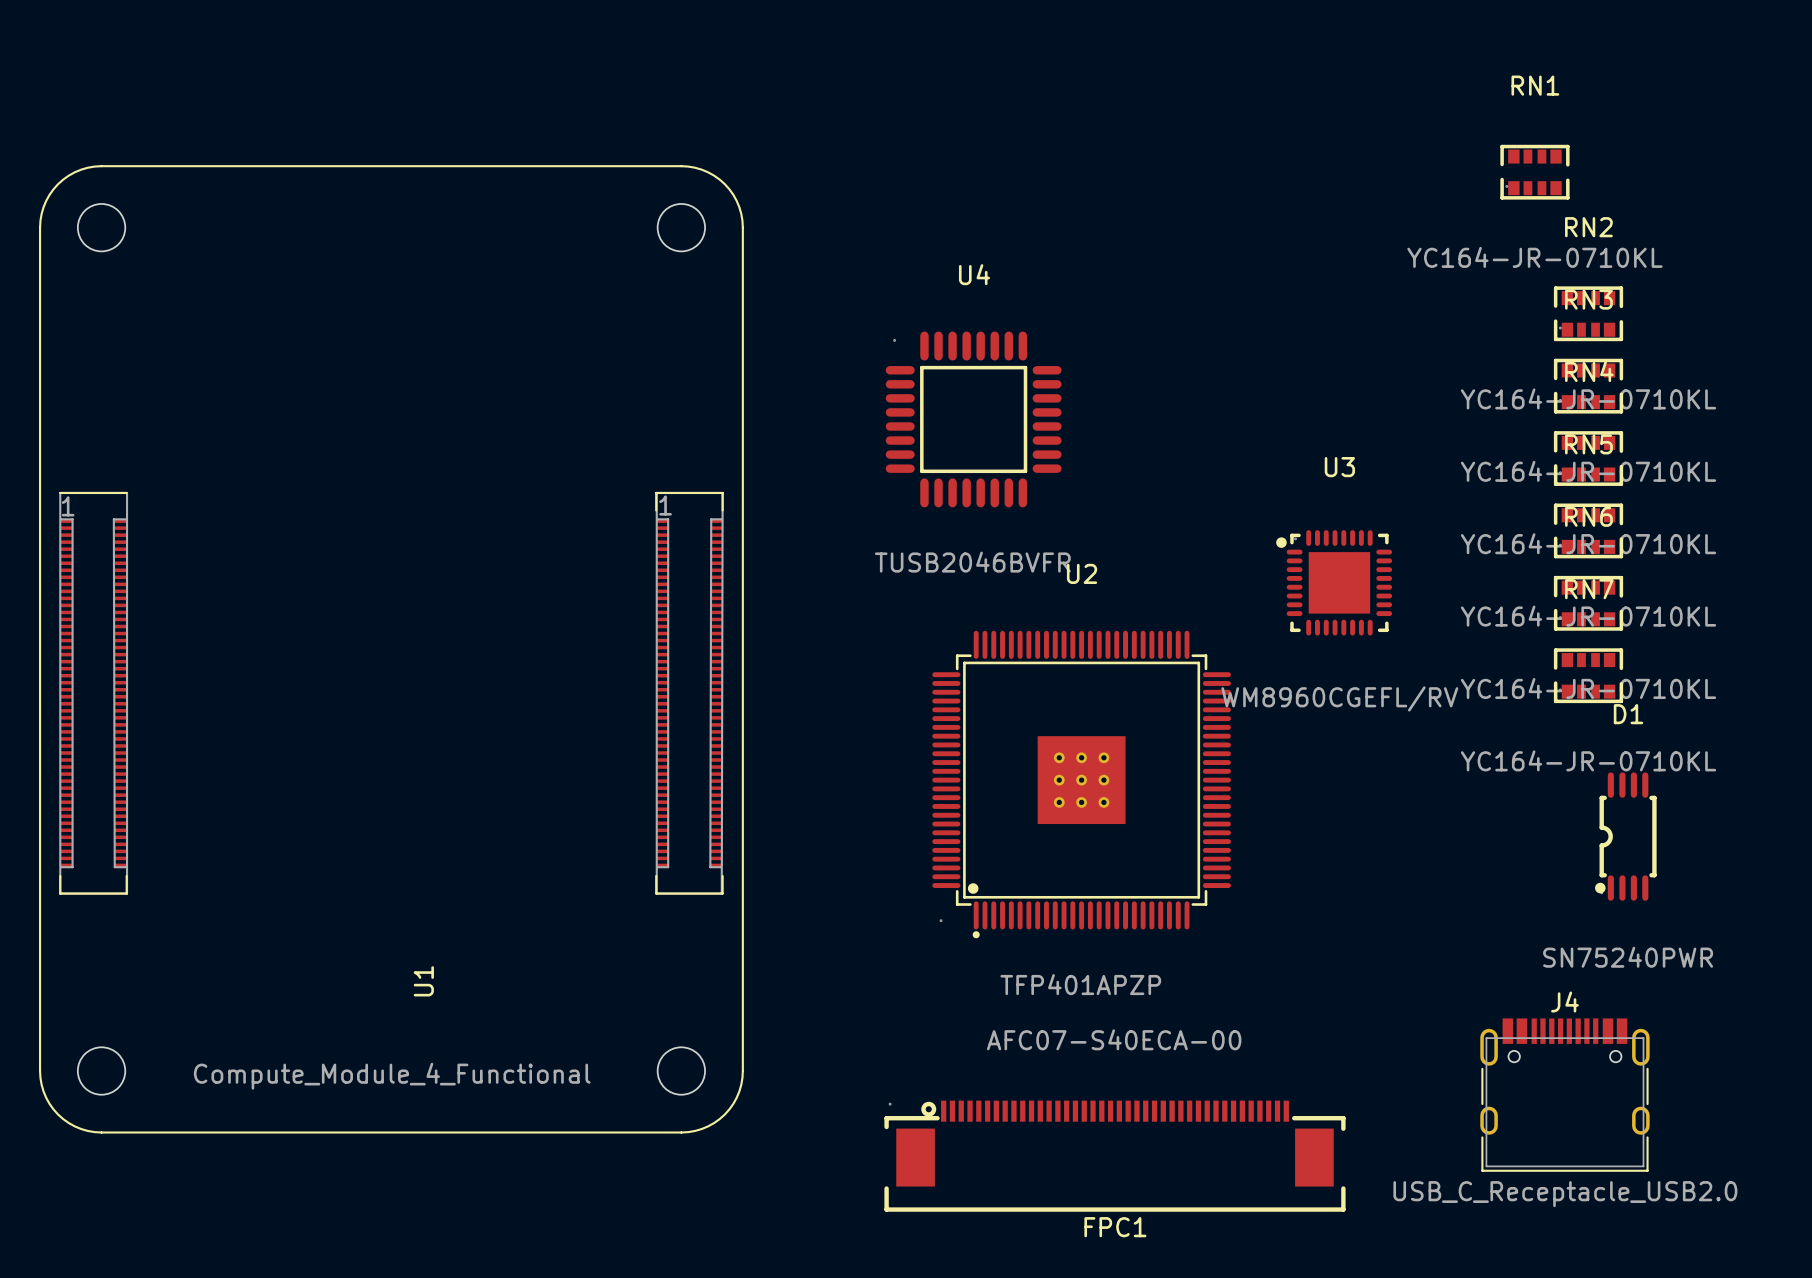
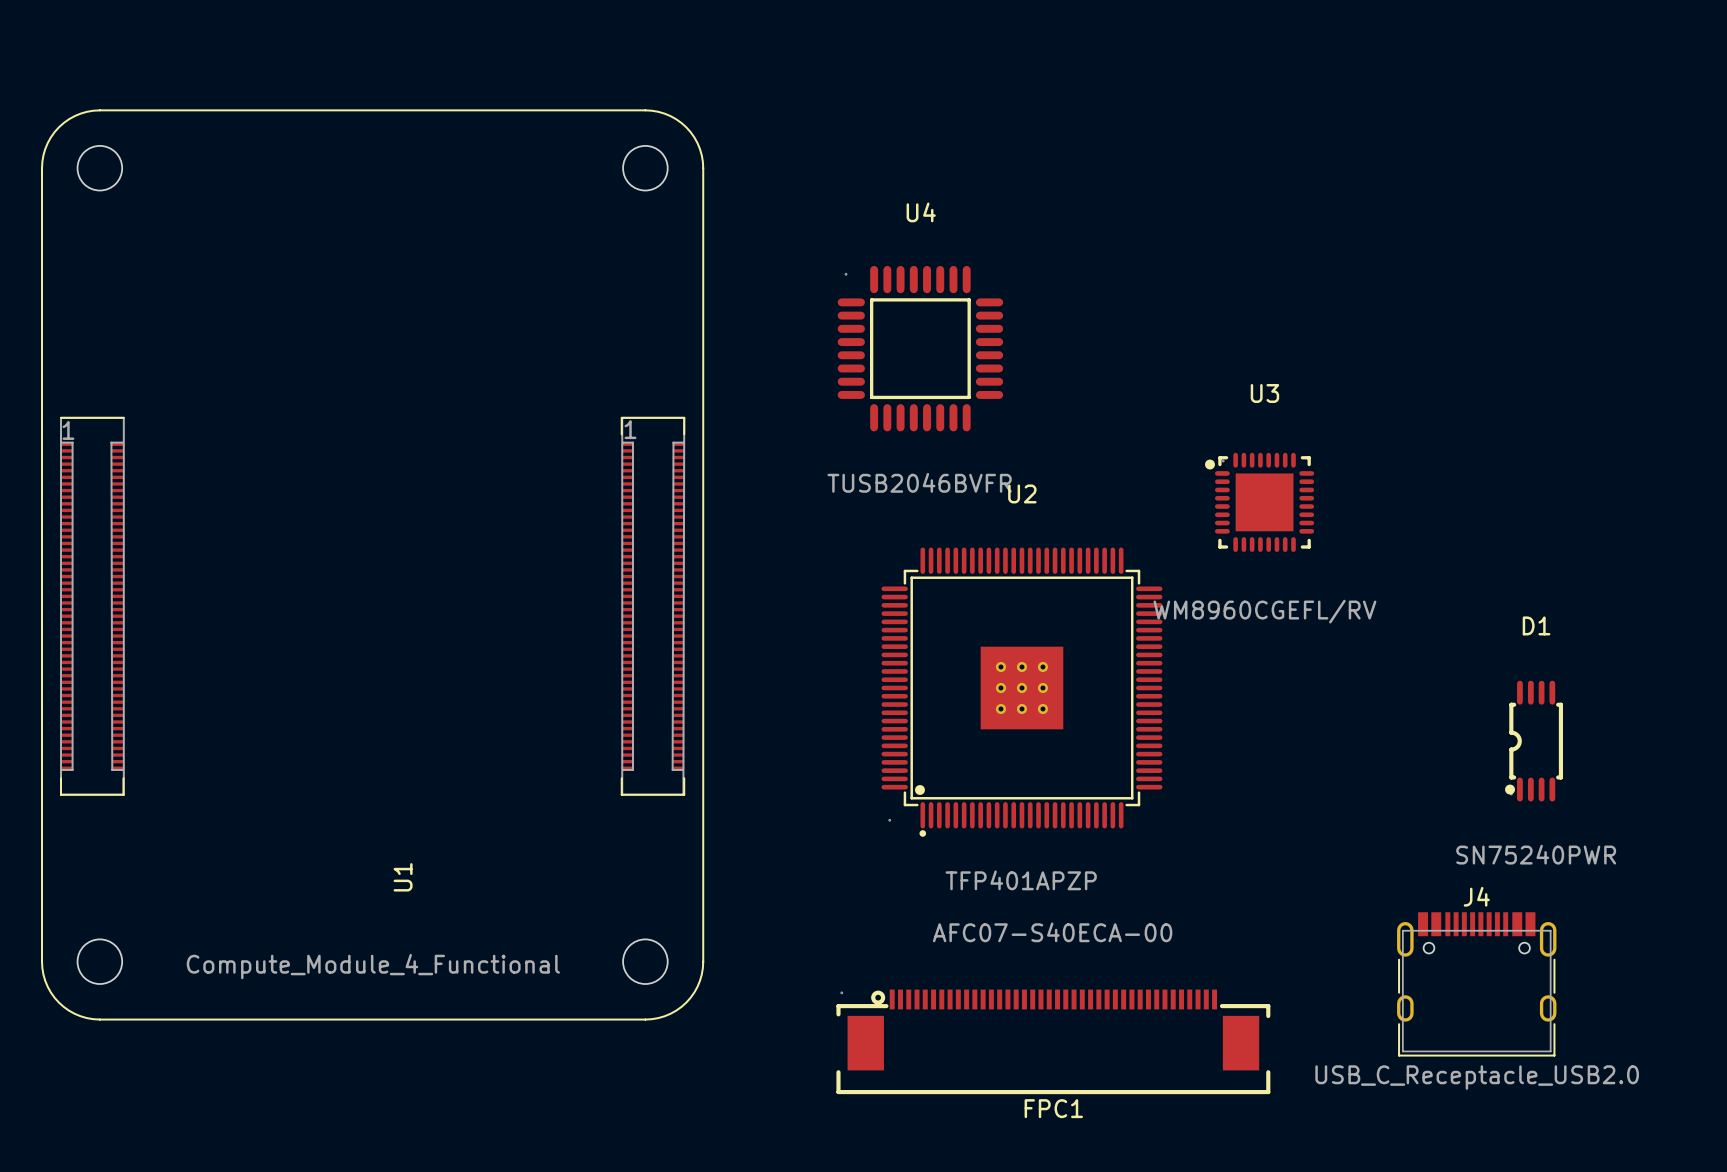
RN1: YC164-JR-0710KL (1534, 172) -> none
RN2: YC164-JR-0710KL (1588, 313) -> none
RN3: YC164-JR-0710KL (1588, 386) -> none
RN4: YC164-JR-0710KL (1588, 458) -> none
RN5: YC164-JR-0710KL (1588, 530) -> none
RN6: YC164-JR-0710KL (1588, 603) -> none
RN7: YC164-JR-0710KL (1588, 675) -> none

